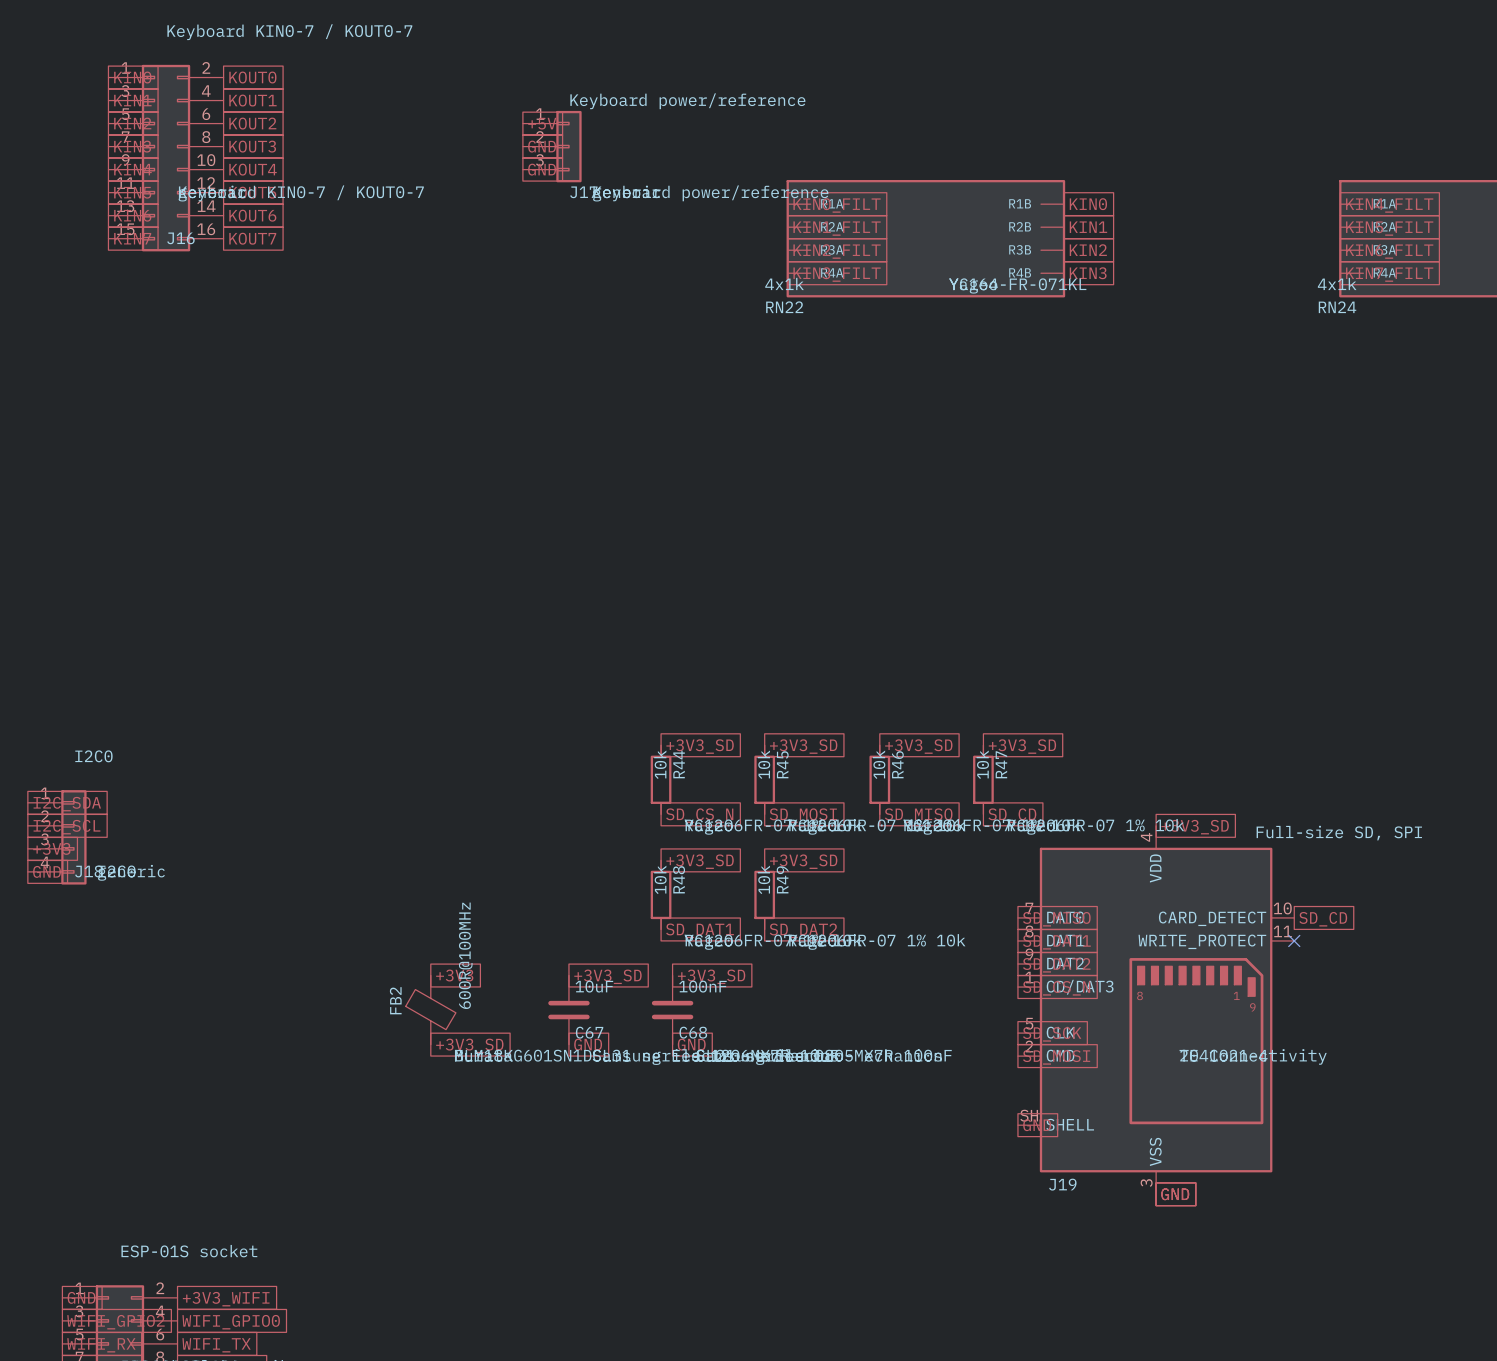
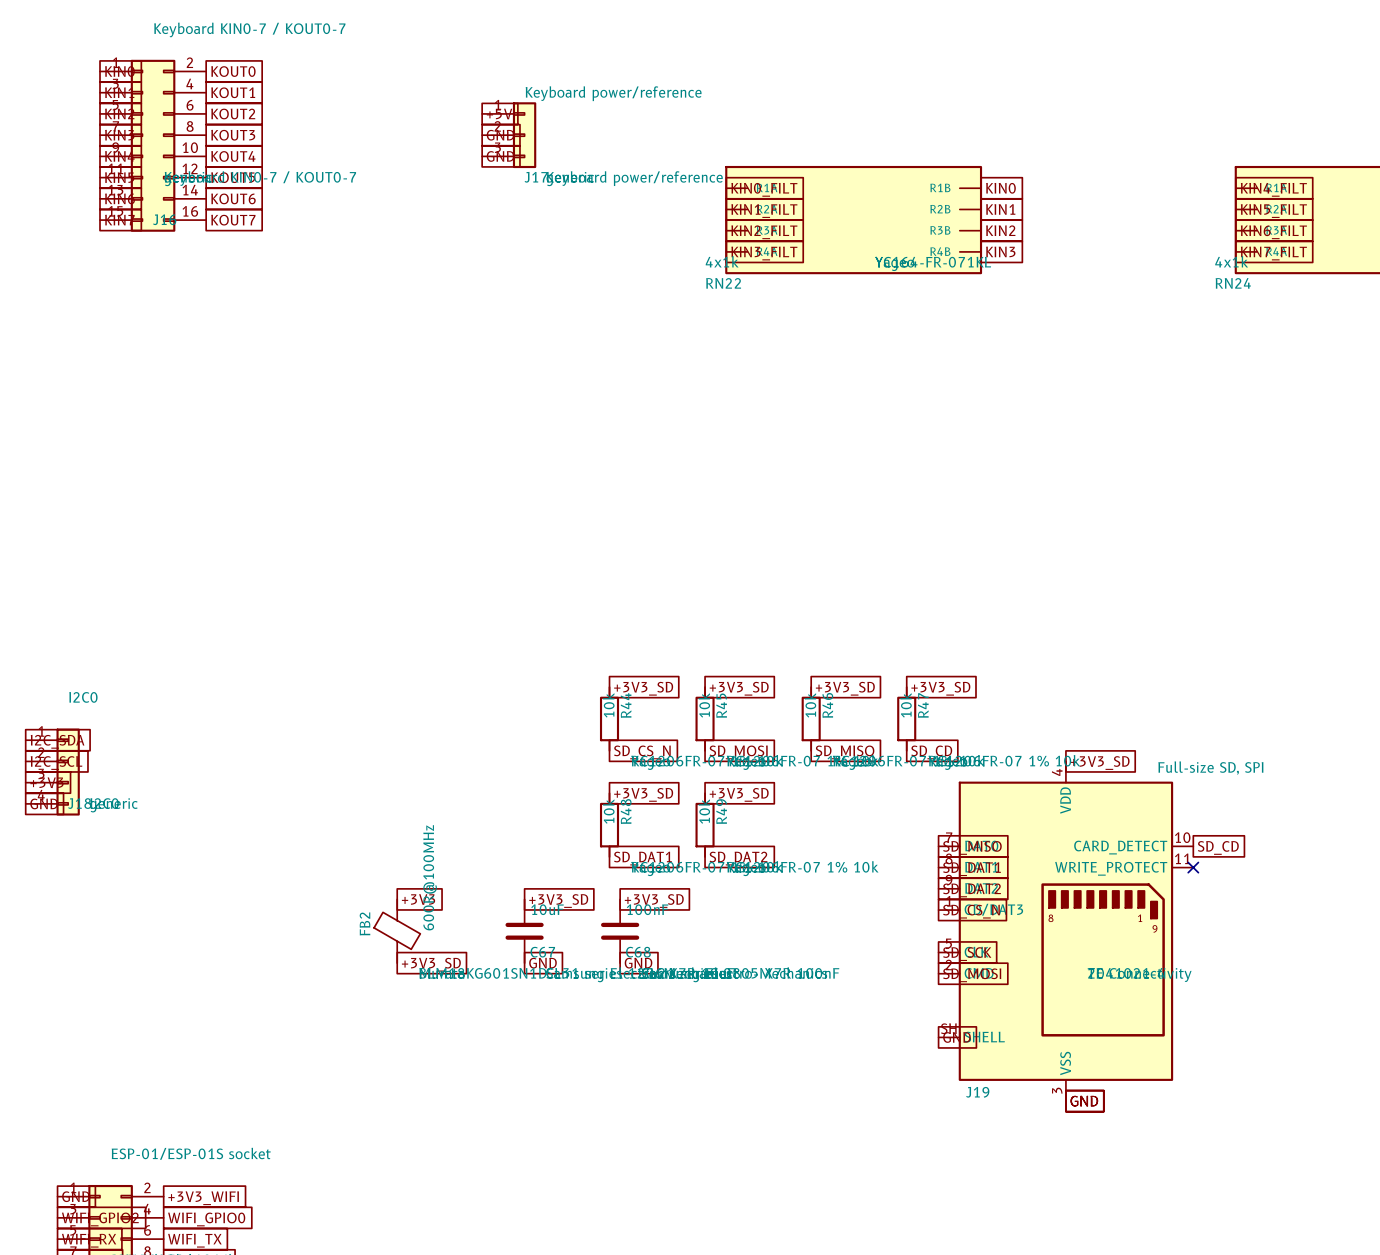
part value: ESP-01S socket (189, 1251) -> ESP-01/ESP-01S socket (191, 1153)

